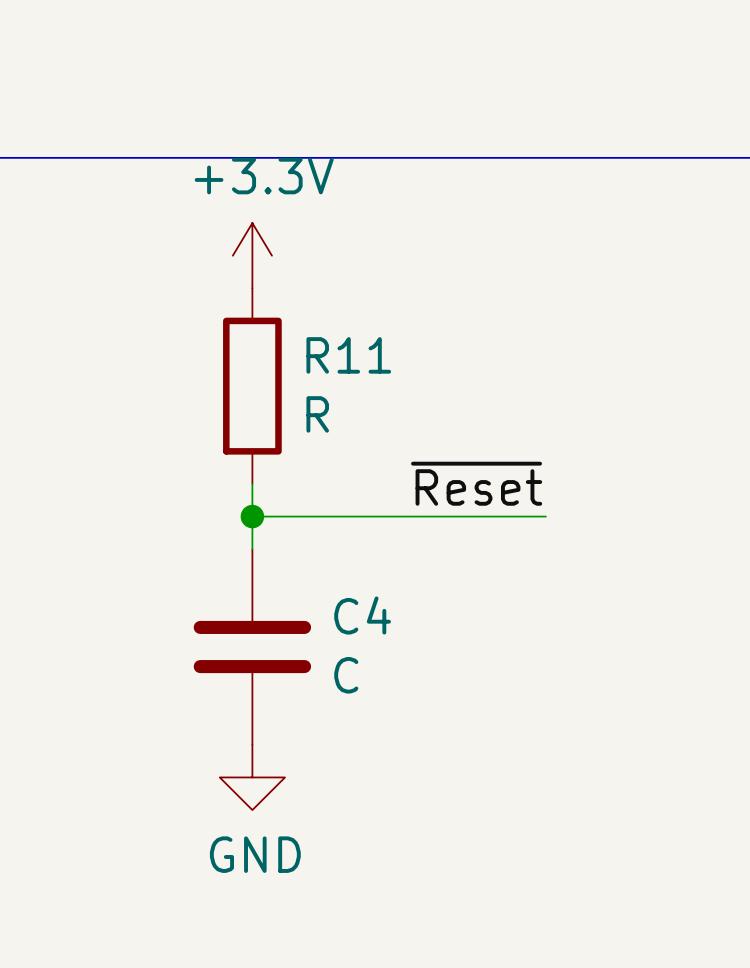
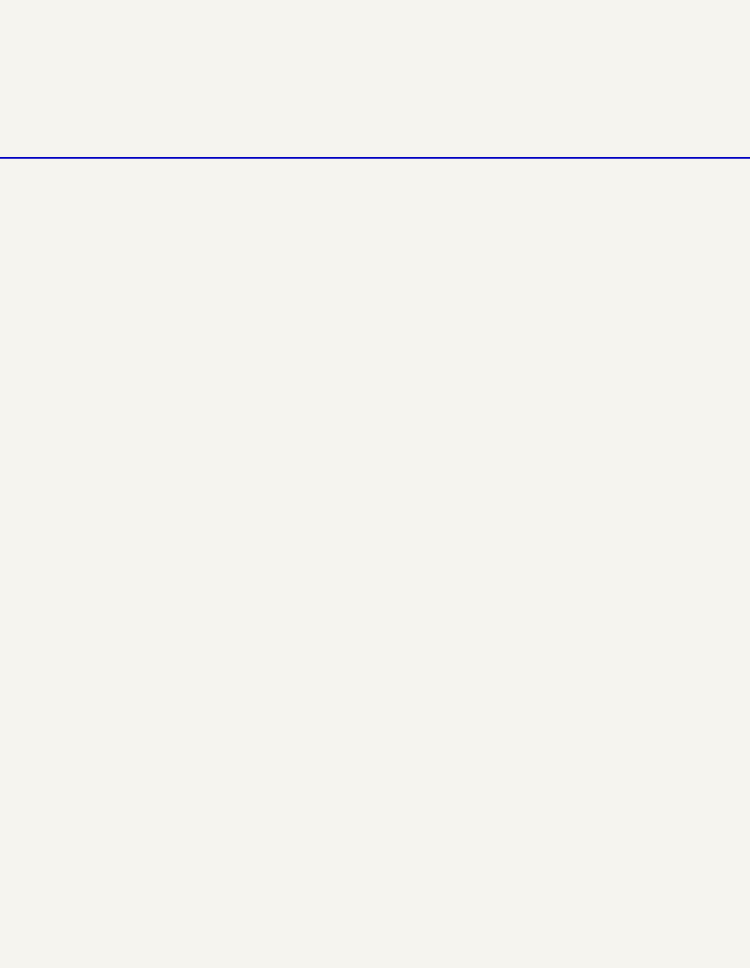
power symbol: +3.3V (252, 255) -> none
R11: R (252, 386) -> none
wire: (252, 483) (252, 549) -> none
label: ~{Reset} (476, 483) -> none
wire: (252, 516) (545, 516) -> none
junction: (252, 516) -> none
C4: C (252, 647) -> none
power symbol: GND (252, 777) -> none

